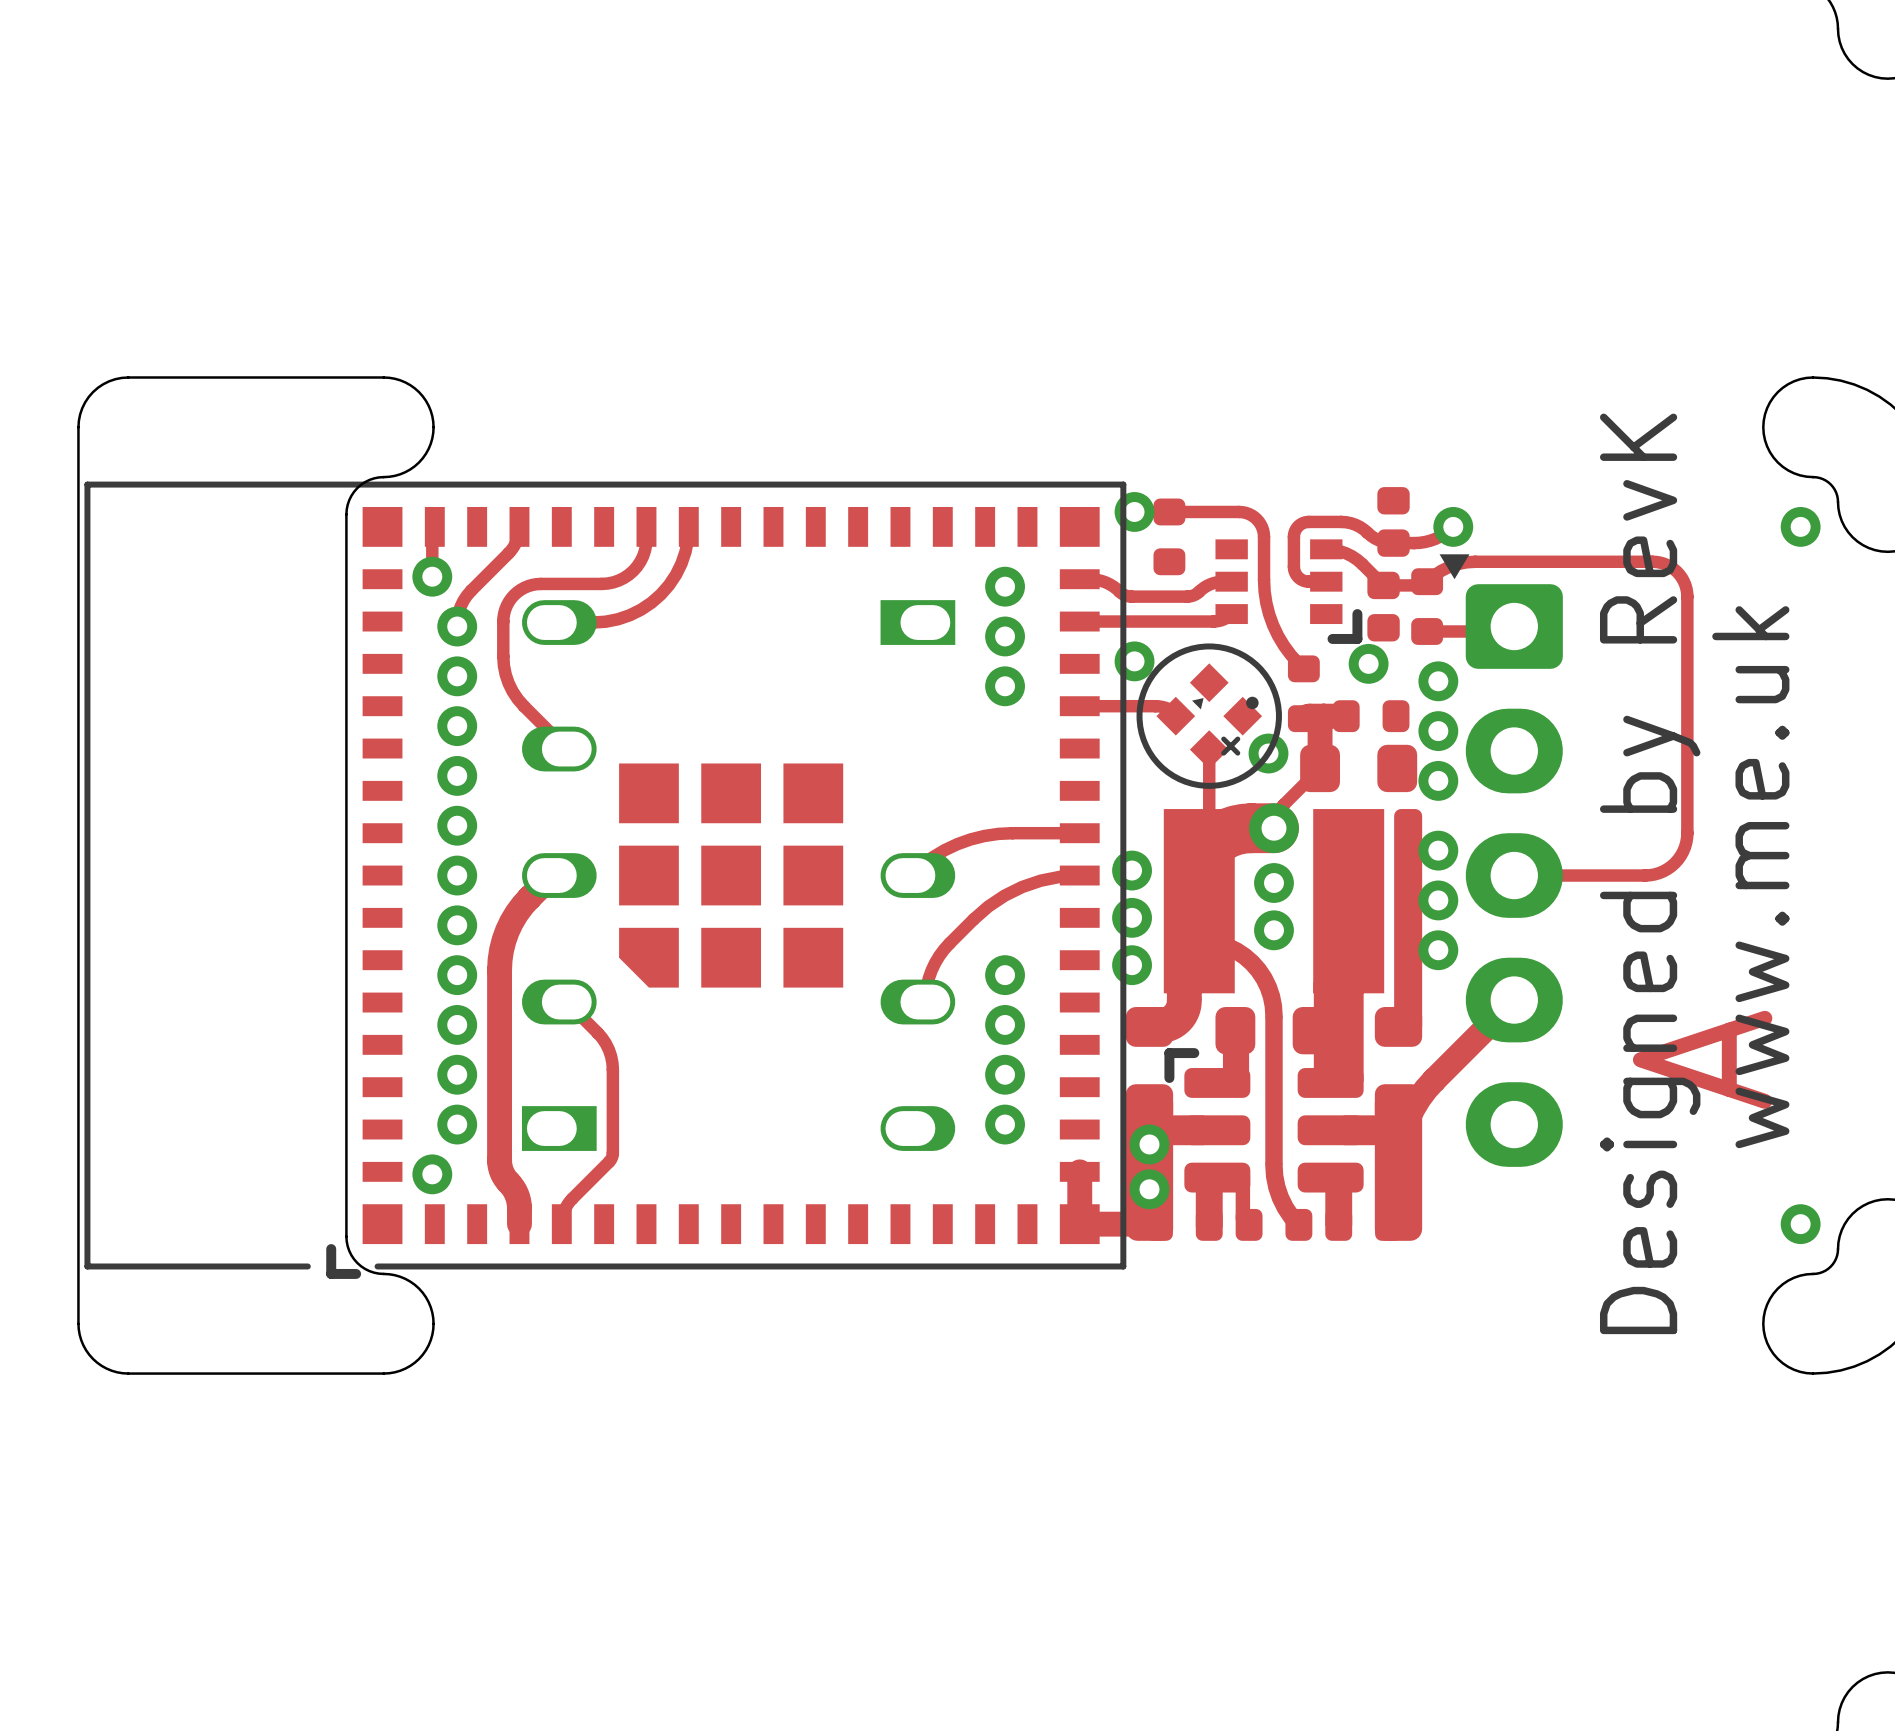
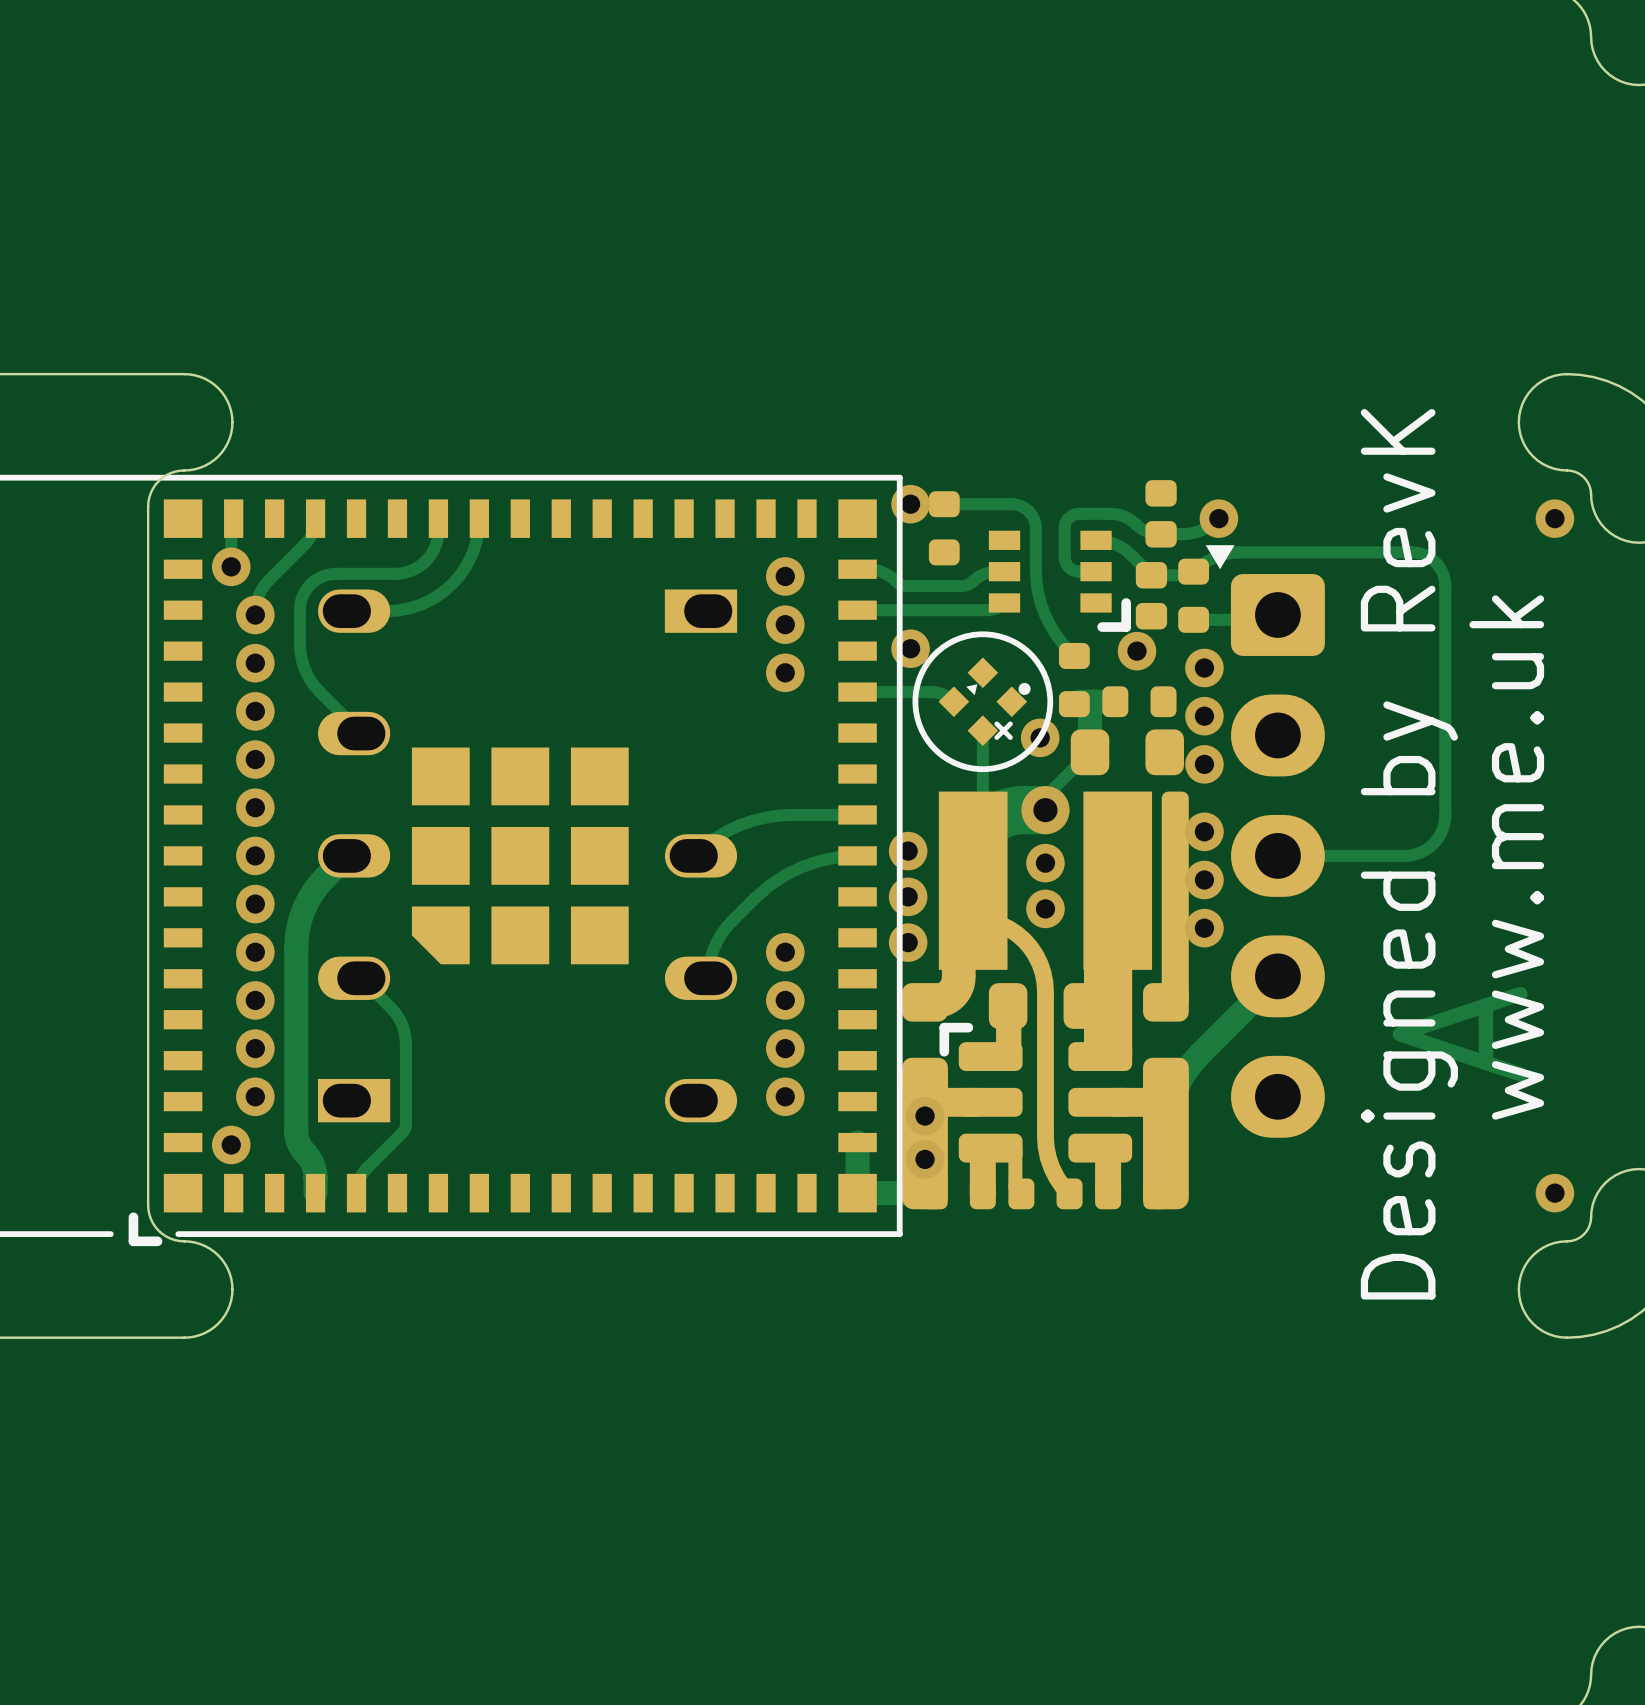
part footprint: [1156, 663, 1263, 769] -> [938, 657, 1031, 747]

